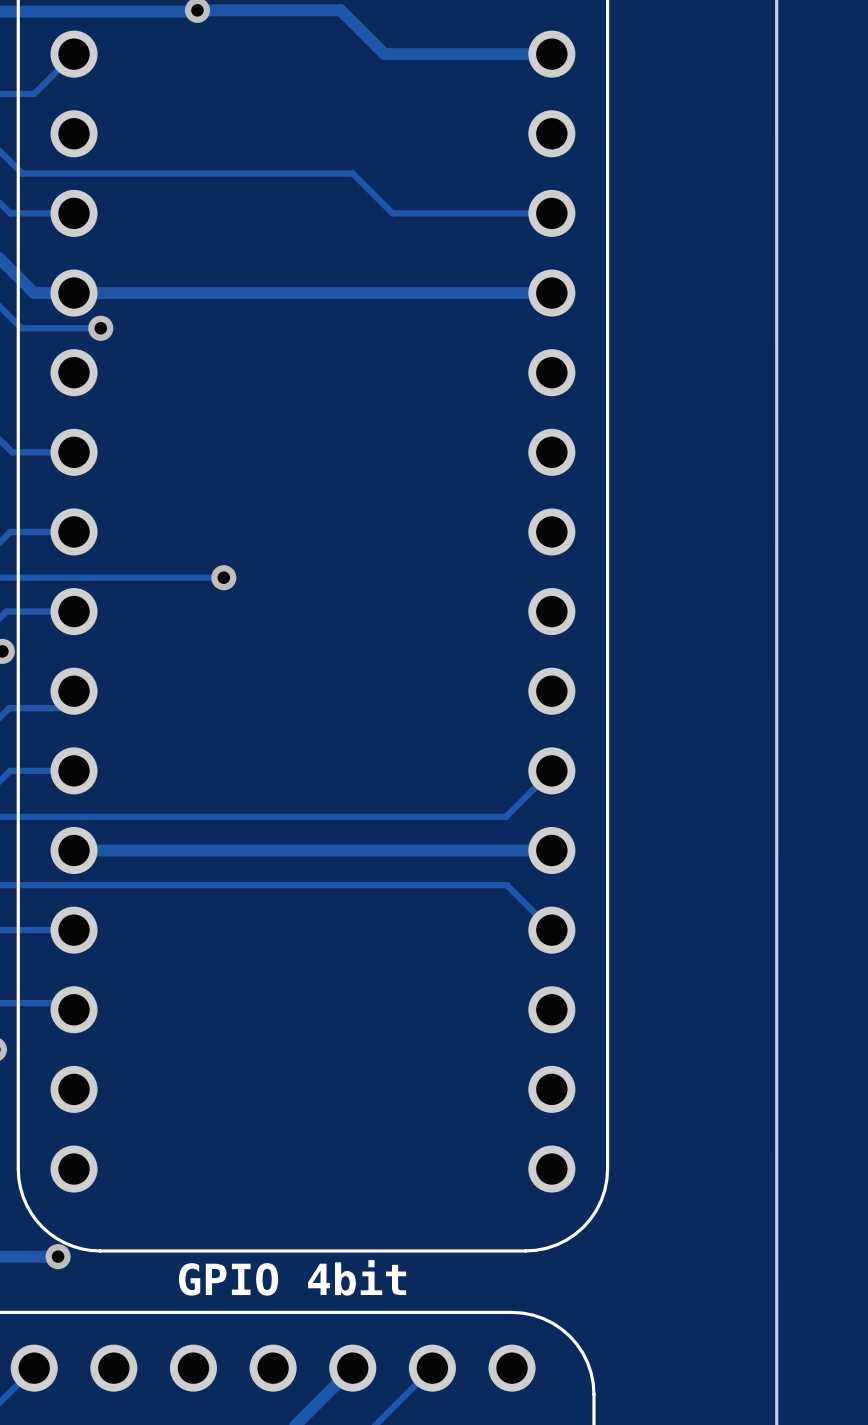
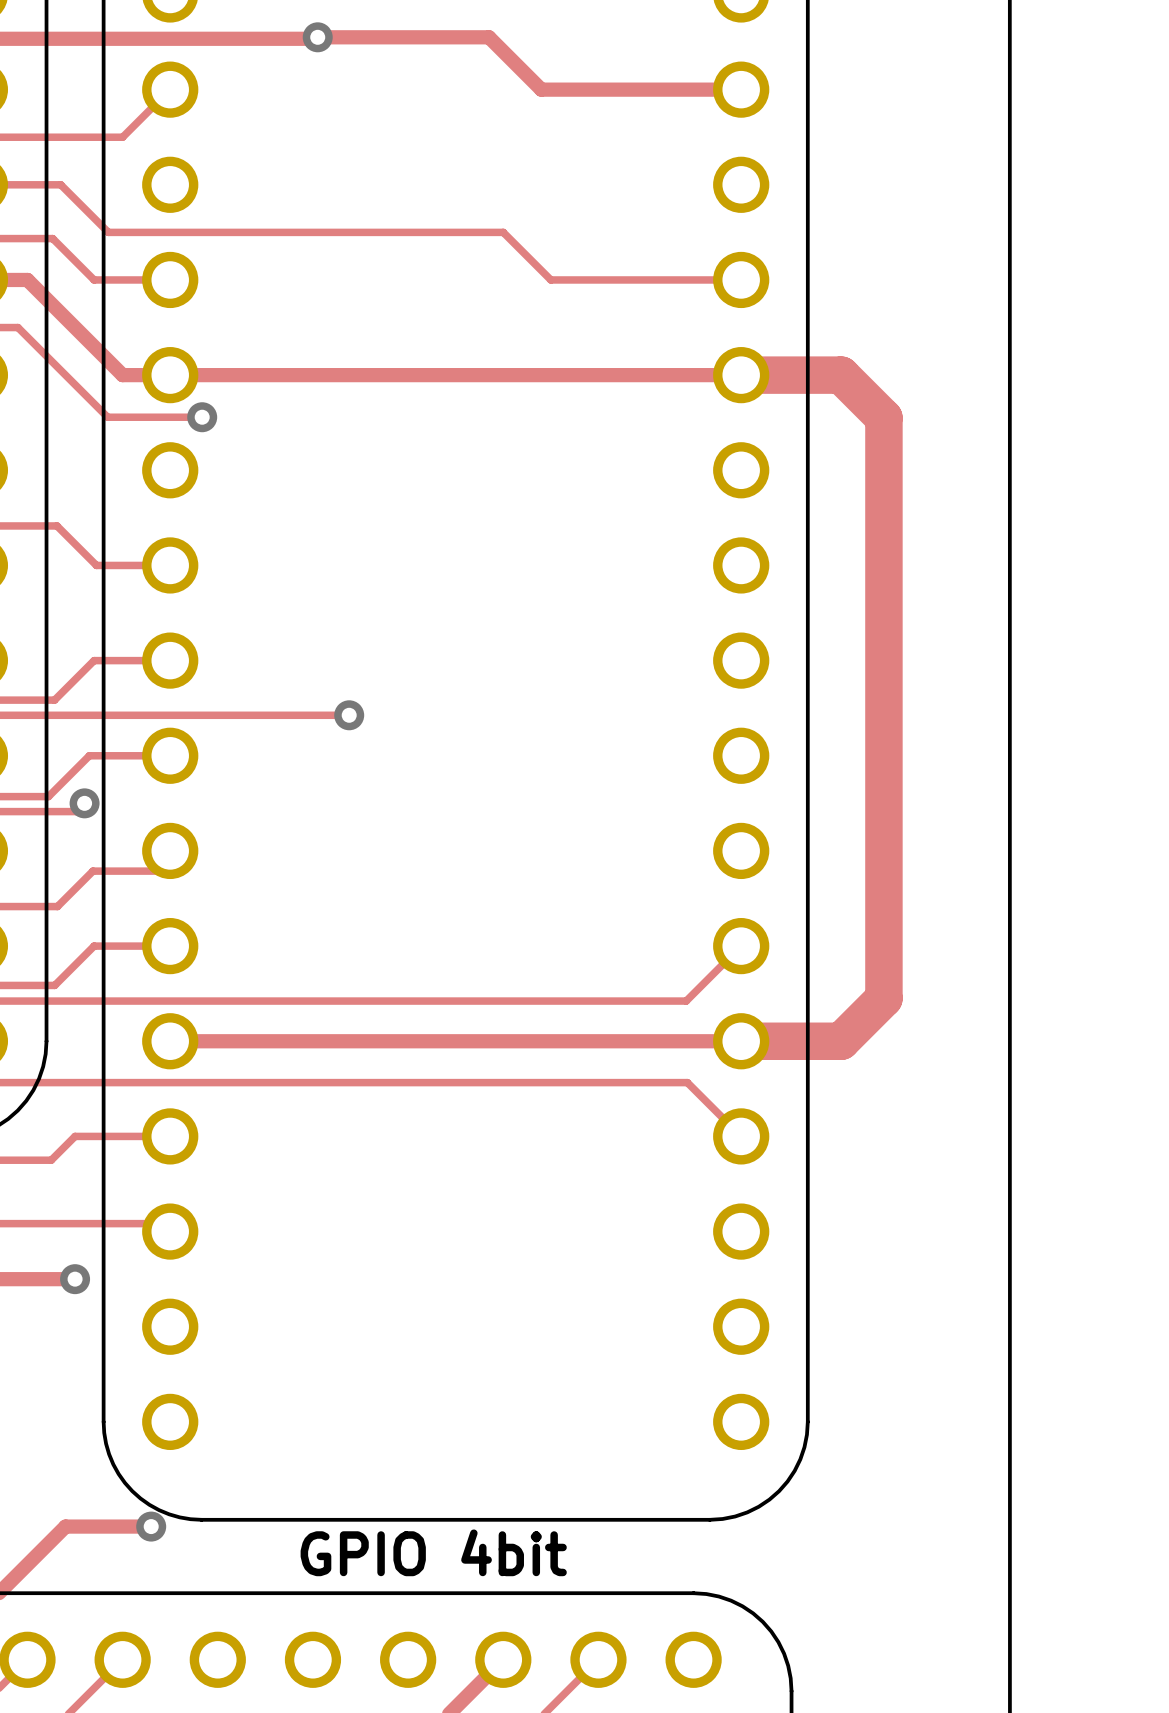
track: none -> (741, 375) (841, 375) (883, 417) (883, 998) (841, 1041) (741, 1041)

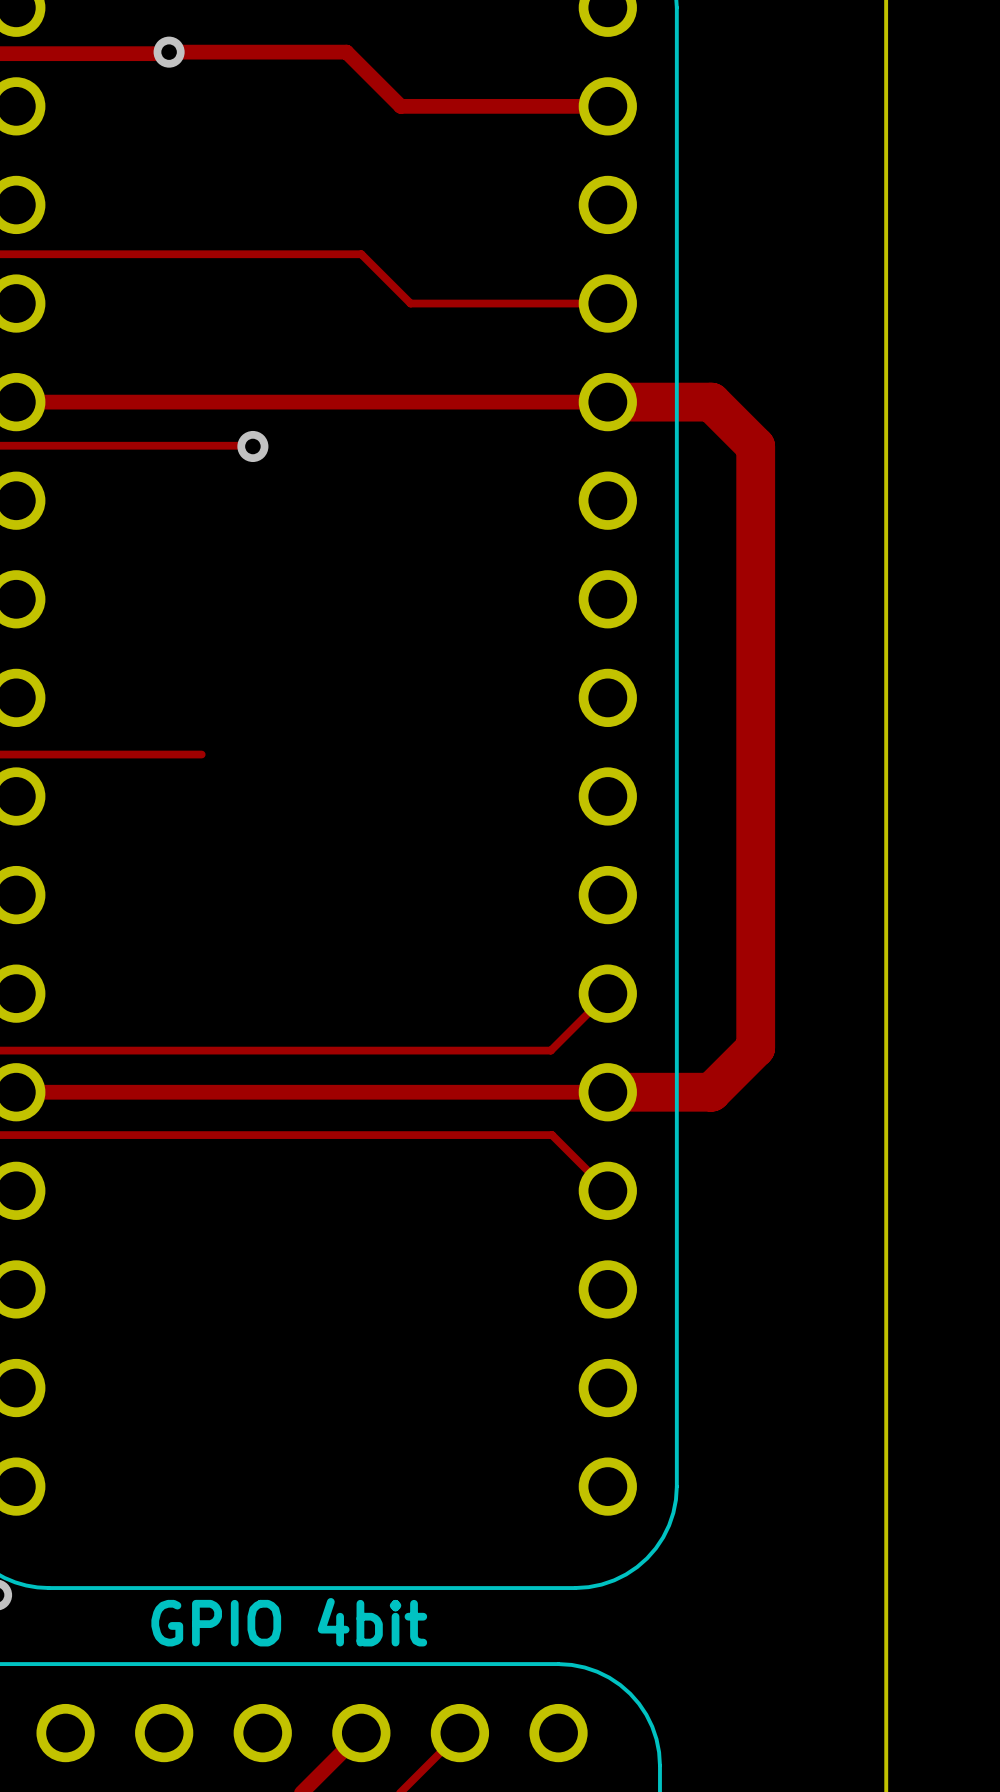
track: none -> (49, 445) (252, 446)
via: (202, 417) -> none
via: none -> (252, 446)
via: (349, 715) -> none

